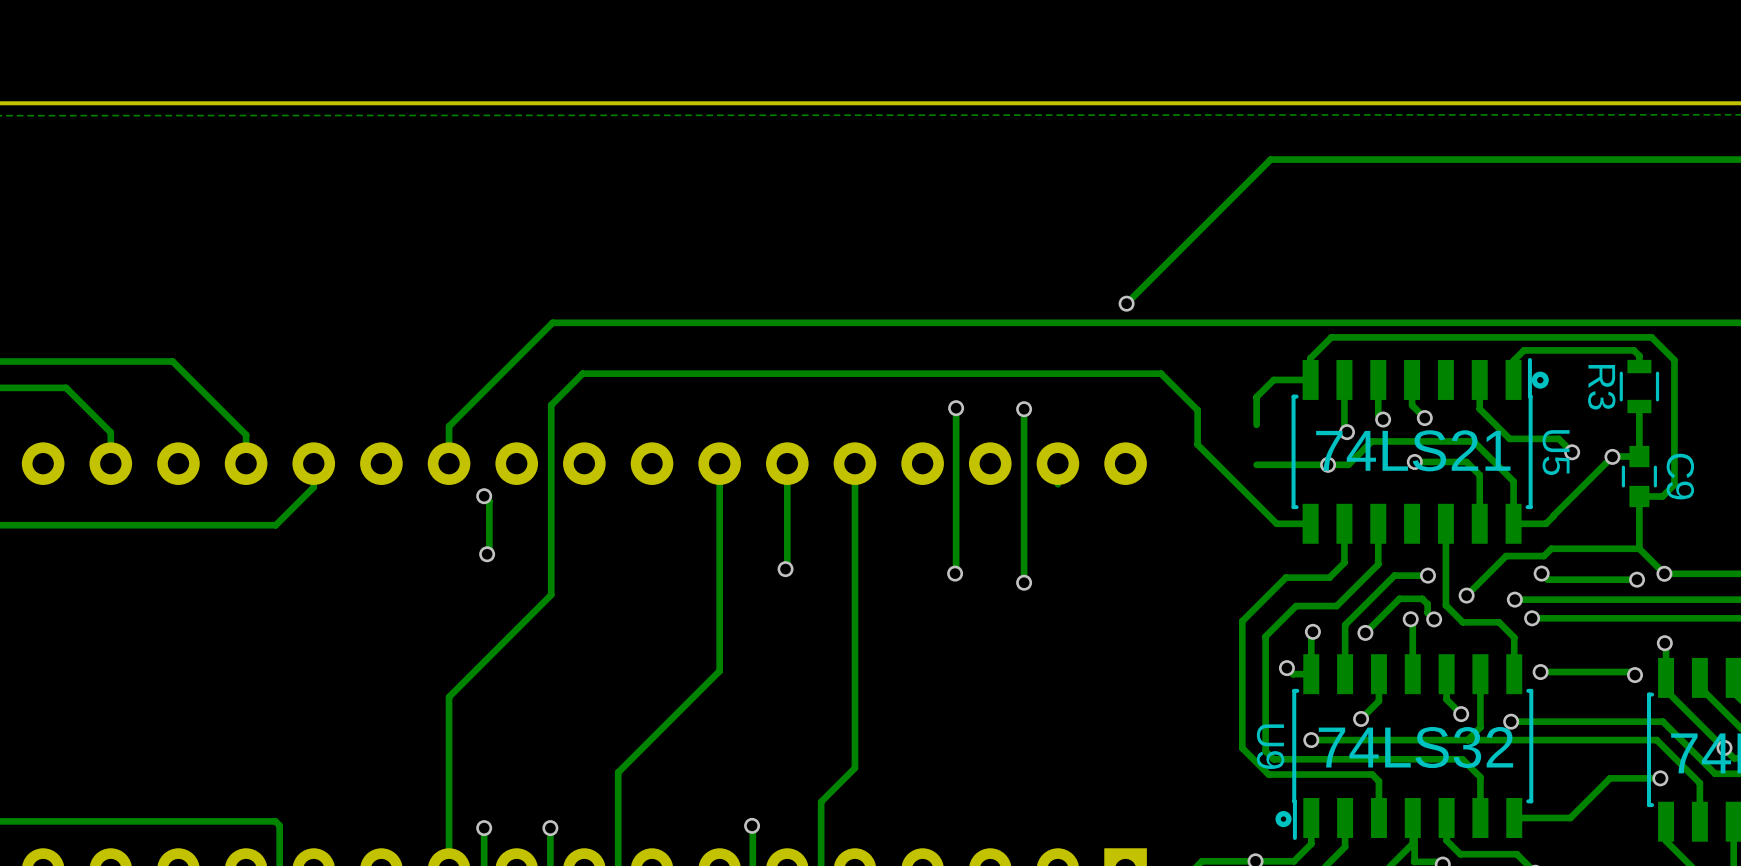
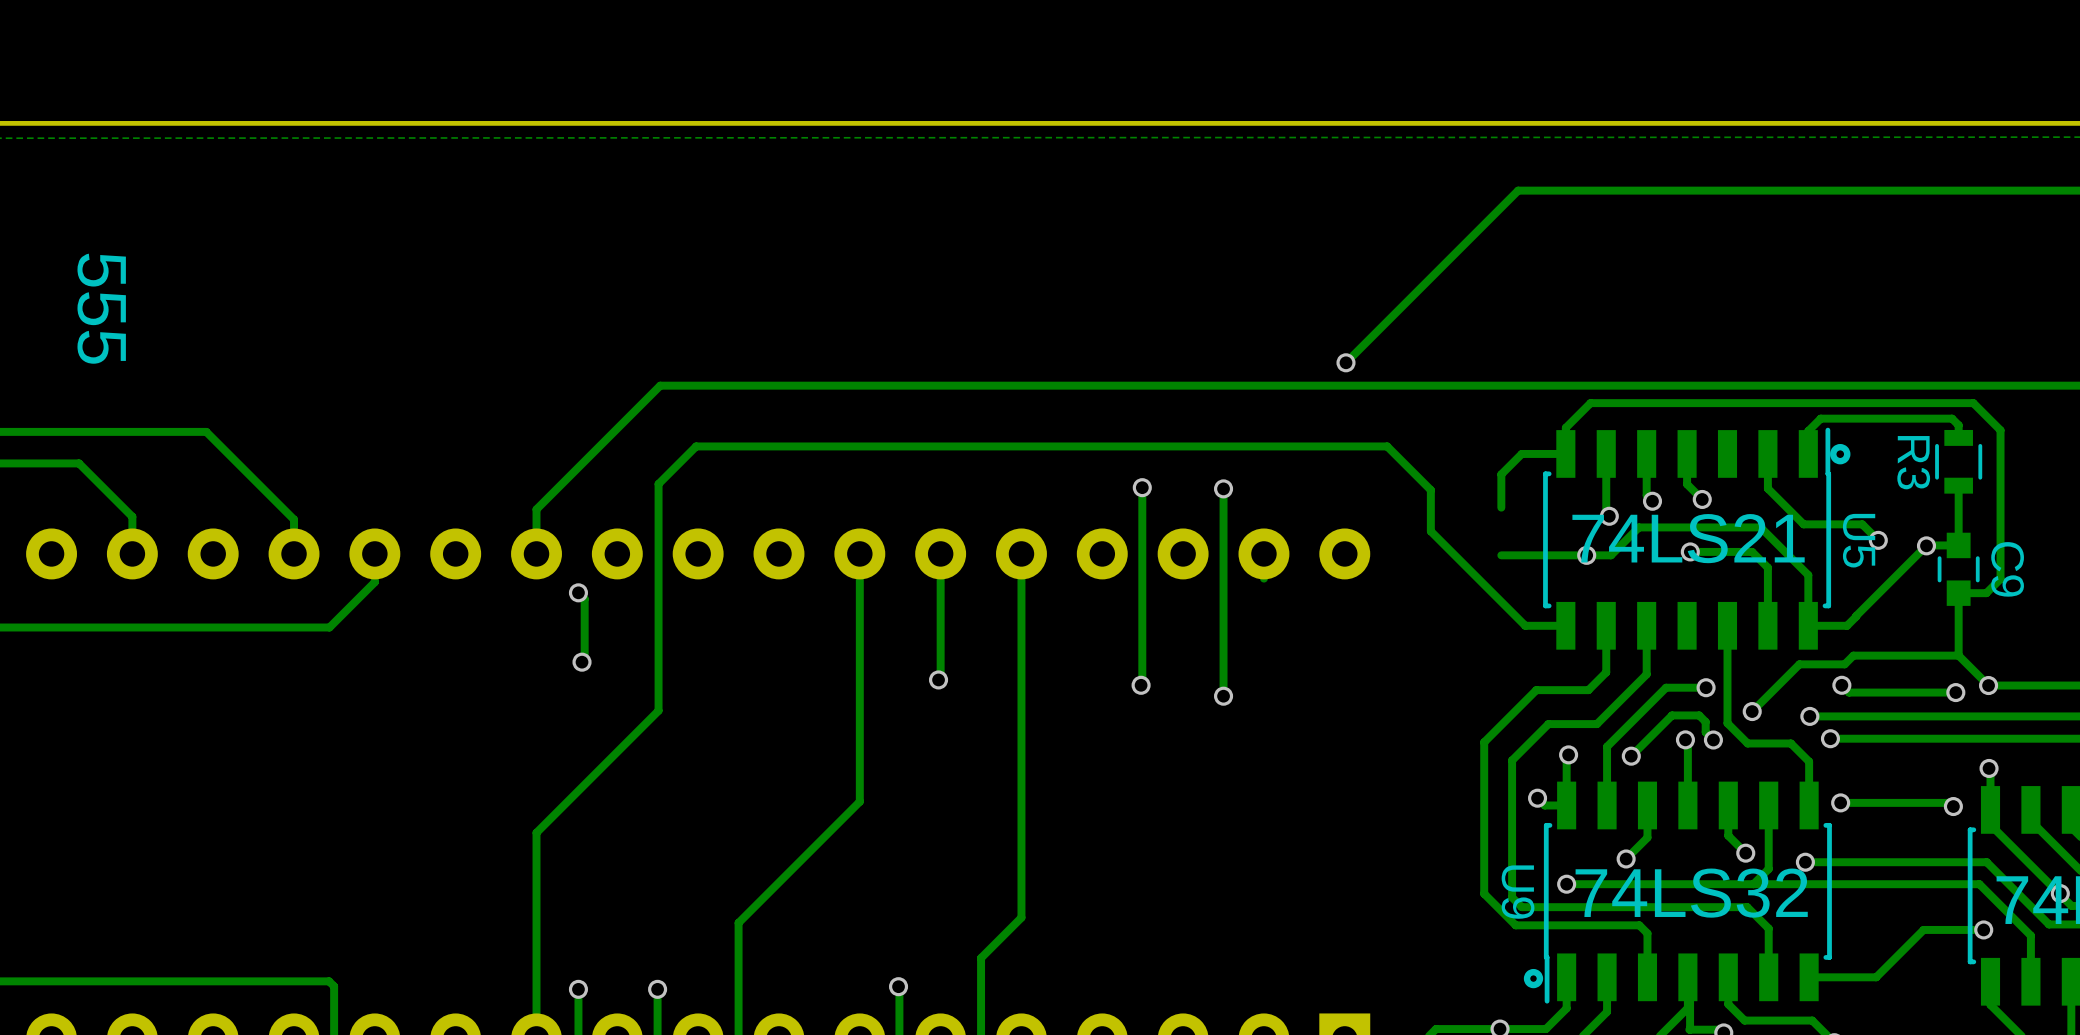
text: none -> 555 (101, 308)

